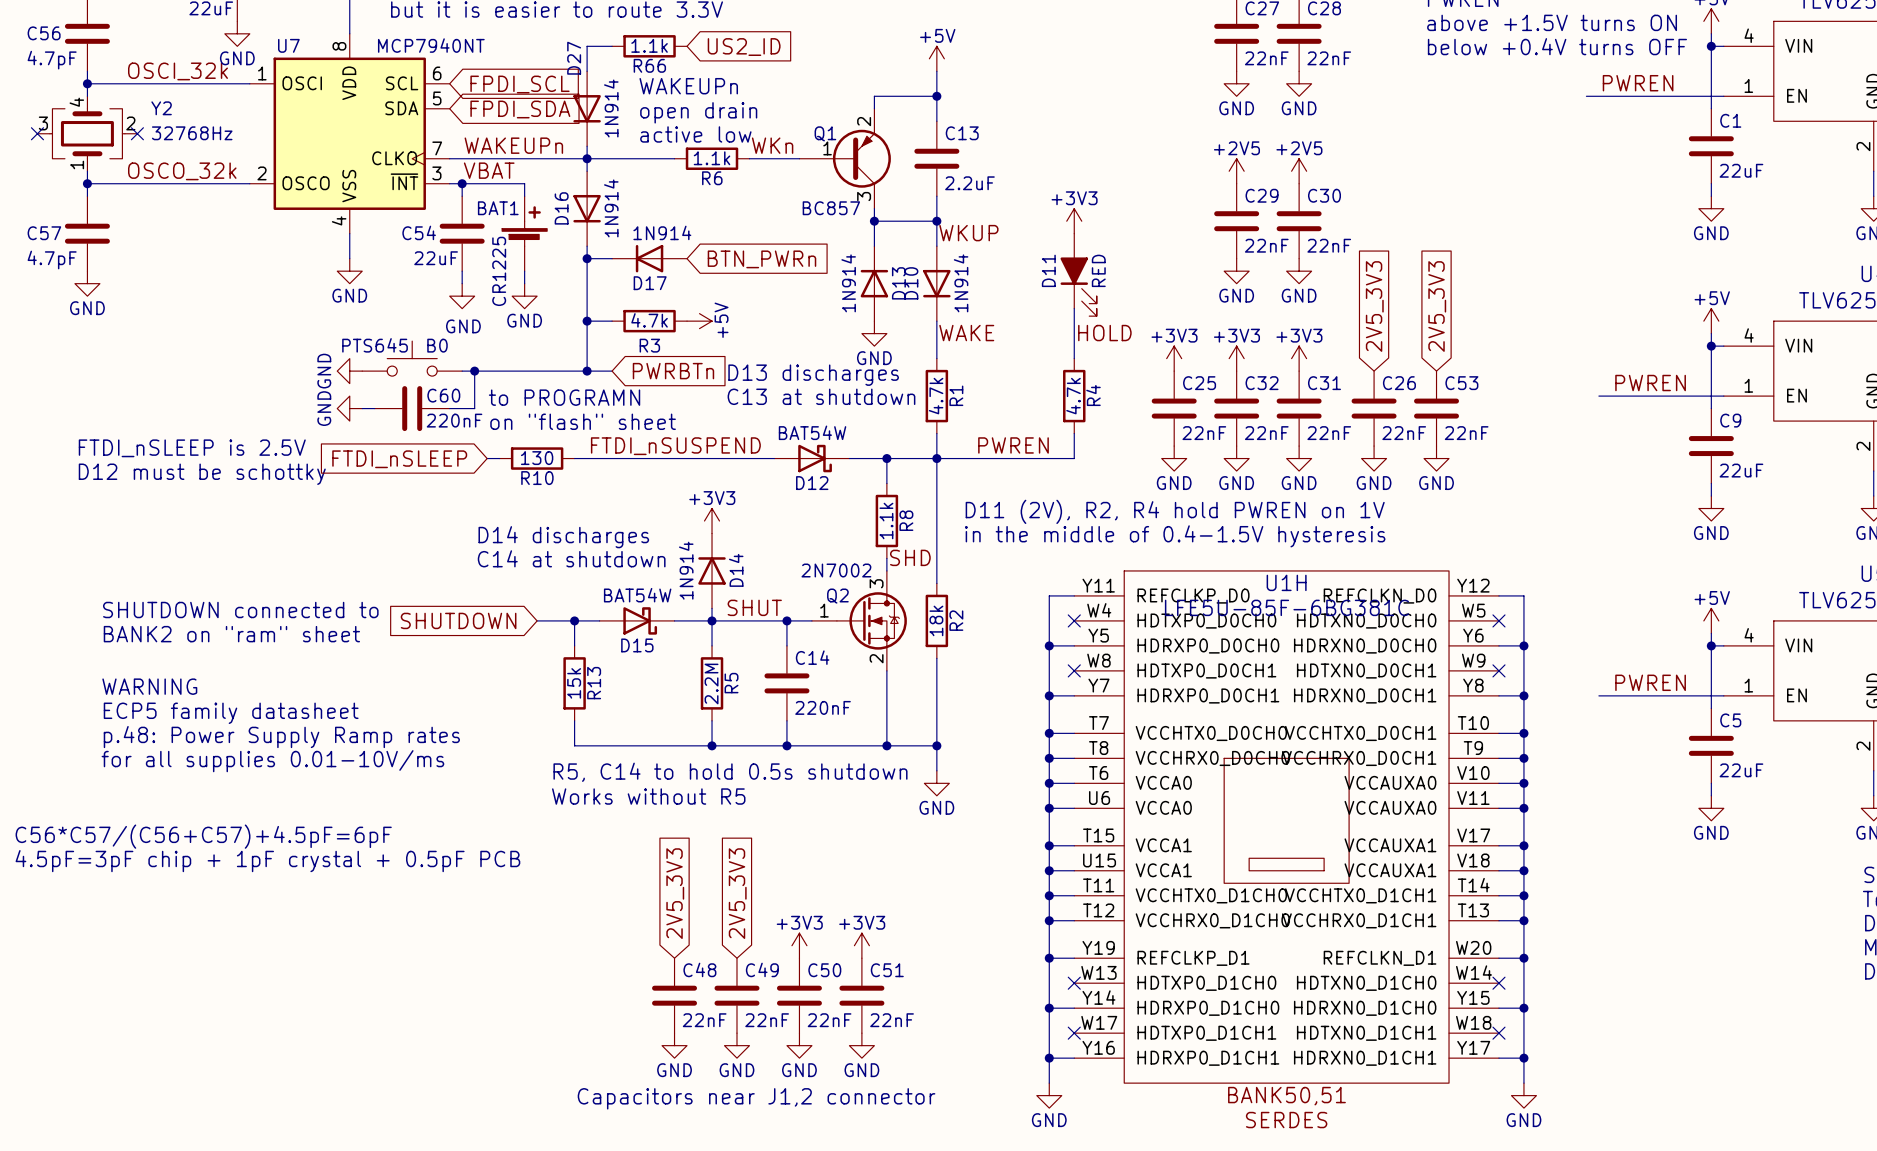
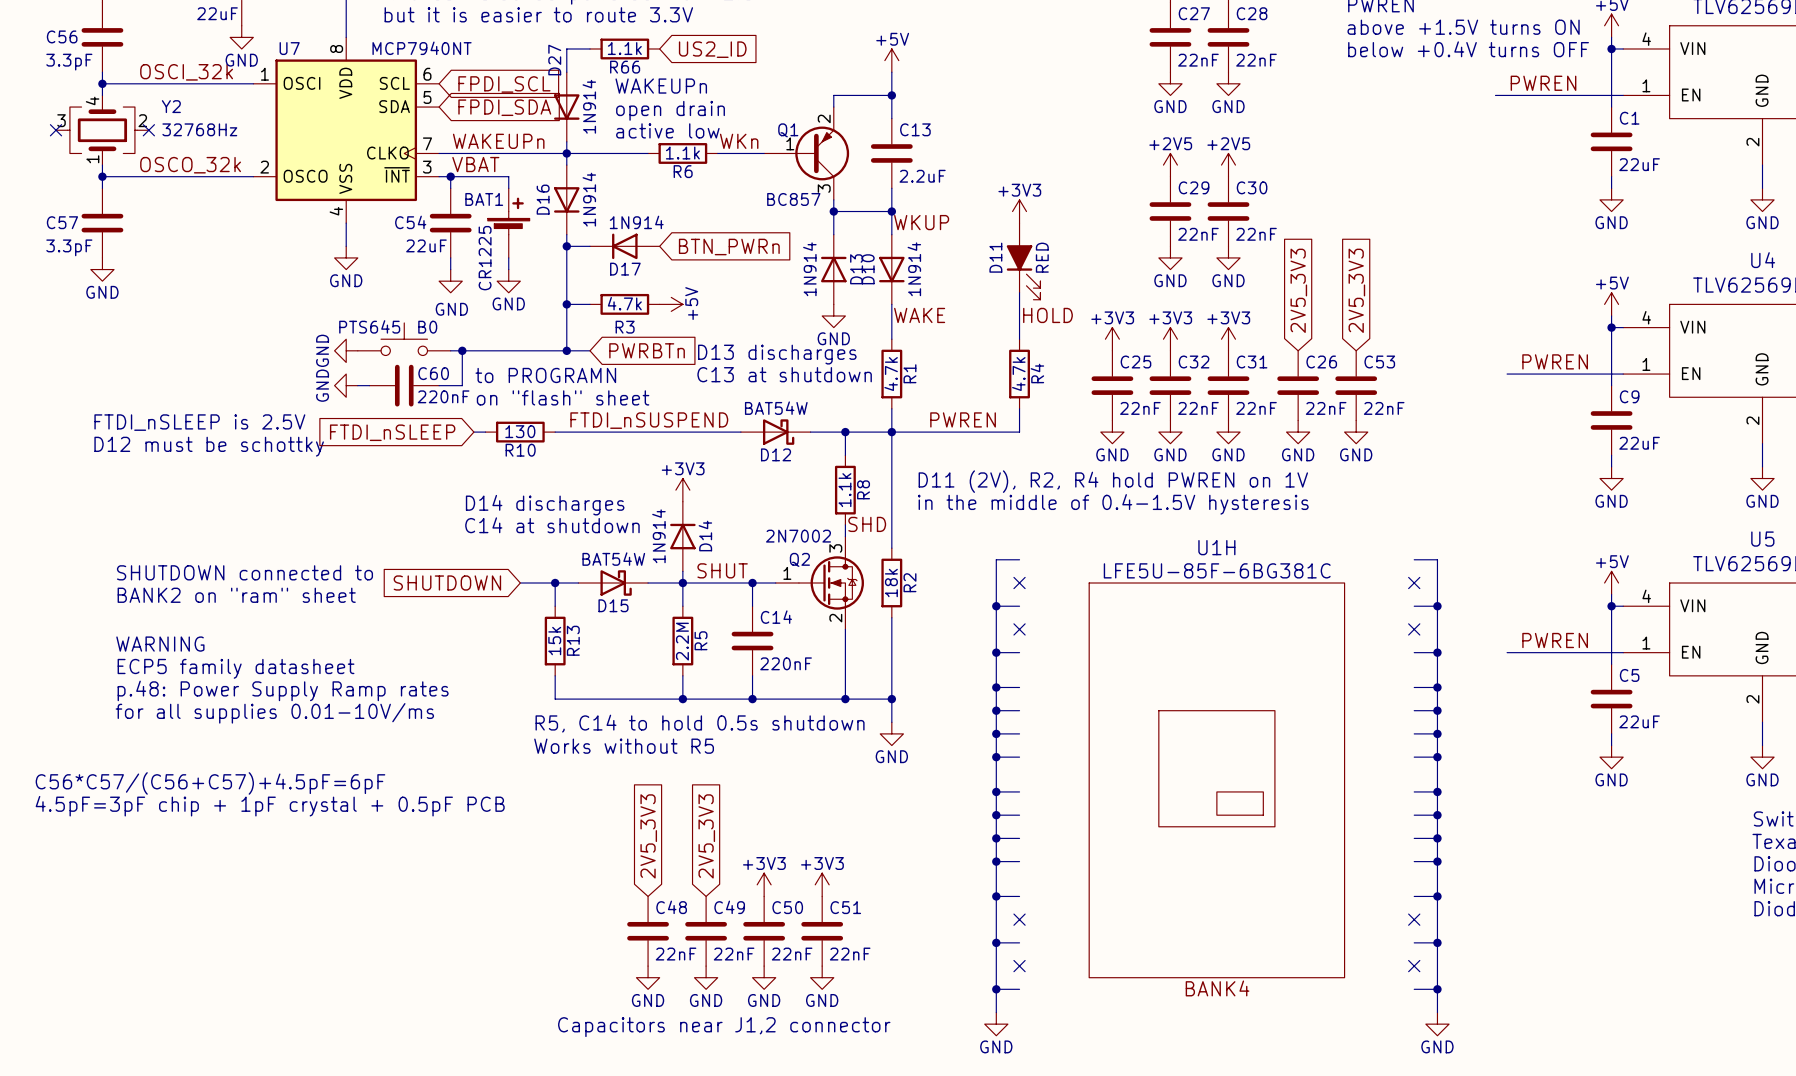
C56 value: 4.7pF (52, 60) -> 3.3pF (69, 62)
C57 value: 4.7pF (52, 259) -> 3.3pF (69, 247)
U1H symbol: [1074, 570, 1499, 1084] -> [1089, 583, 1345, 978]

